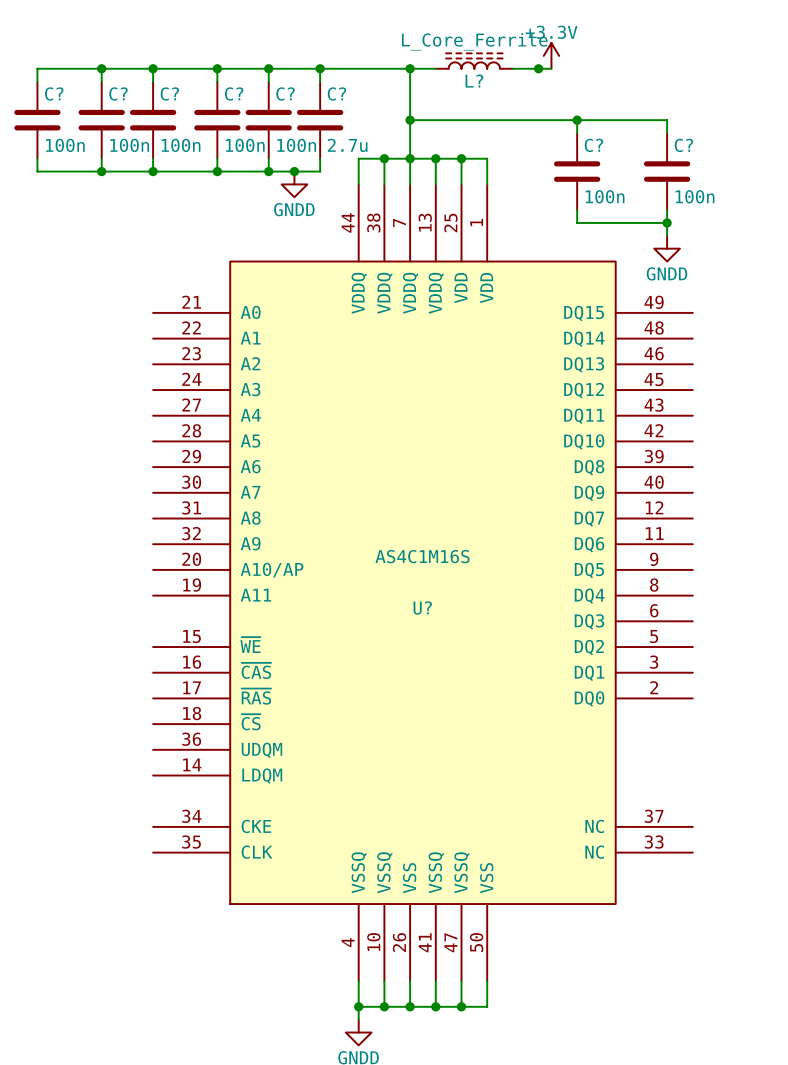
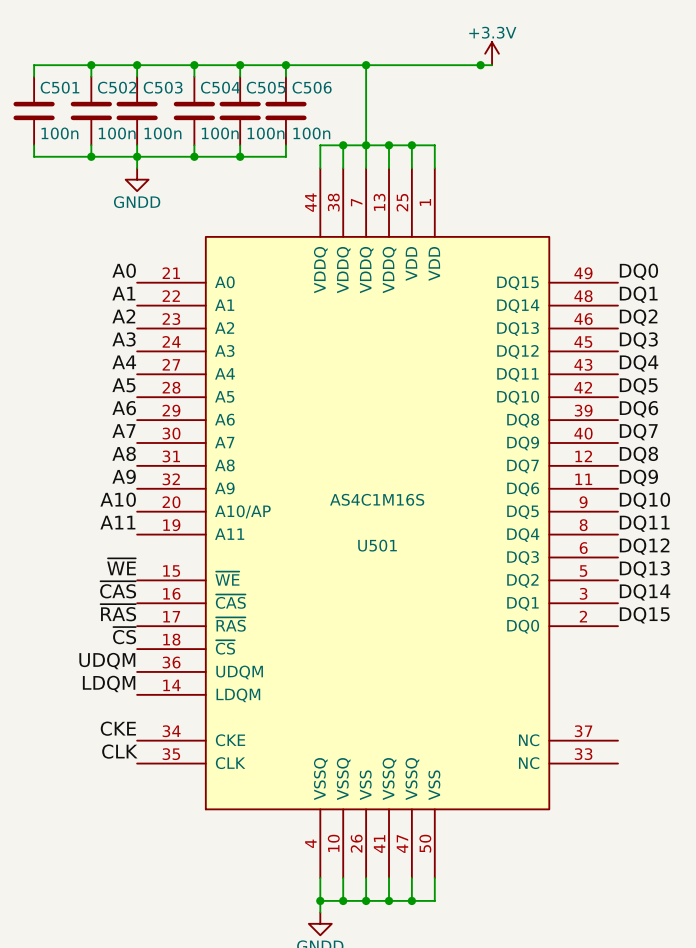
L?: L_Core_Ferrite (474, 61) -> none
wire: none -> (389, 65) (457, 65)
C? name: C? (54, 93) -> C501 (60, 87)
C? name: C? (118, 93) -> C502 (117, 87)
C? name: C? (169, 93) -> C503 (163, 87)
C? name: C? (234, 93) -> C504 (220, 87)
C? name: C? (285, 93) -> C505 (266, 87)
C? name: C? (336, 93) -> C506 (312, 87)
wire: (410, 120) (667, 120) (667, 133) -> none
junction: (410, 120) -> none
wire: (577, 120) (577, 133) -> none
junction: (577, 120) -> none
C? value: 2.7u (347, 145) -> 100n (311, 133)
wire: none -> (137, 156) (137, 168)
junction: (294, 171) -> none
C?: 100n (577, 171) -> none
C?: 100n (667, 171) -> none
power symbol position: GNDD (294, 184) -> GNDD (137, 179)
wire: (577, 210) (577, 222) (667, 222) -> none
wire: (667, 210) (667, 235) -> none
junction: (667, 222) -> none
power symbol: GNDD (667, 248) -> none
label: none -> A0 (124, 270)
label: none -> DQ0 (638, 271)
label: none -> A1 (123, 293)
label: none -> DQ1 (638, 294)
label: none -> A2 (123, 316)
label: none -> DQ2 (638, 317)
label: none -> A3 (124, 339)
label: none -> DQ3 (638, 340)
label: none -> A4 (124, 362)
label: none -> DQ4 (639, 363)
label: none -> A5 (123, 385)
label: none -> DQ5 (638, 386)
label: none -> A6 (124, 408)
label: none -> DQ6 (638, 409)
label: none -> A7 (123, 431)
label: none -> DQ7 (638, 432)
label: none -> A8 (124, 453)
label: none -> DQ8 (638, 454)
label: none -> A9 (124, 476)
label: none -> DQ9 (638, 477)
label: none -> A10 (118, 499)
label: none -> DQ10 (644, 500)
label: none -> A11 (117, 522)
label: none -> DQ11 (644, 523)
U? name: U? (422, 608) -> U501 (377, 545)
label: none -> DQ12 (644, 546)
label: none -> ~{WE} (121, 566)
label: none -> DQ13 (644, 569)
label: none -> ~{CAS} (118, 589)
label: none -> DQ14 (645, 592)
label: none -> ~{RAS} (118, 612)
label: none -> DQ15 (644, 615)
label: none -> ~{CS} (124, 635)
label: none -> UDQM (107, 661)
label: none -> LDQM (109, 683)
label: none -> CKE (118, 728)
label: none -> CLK (119, 751)

